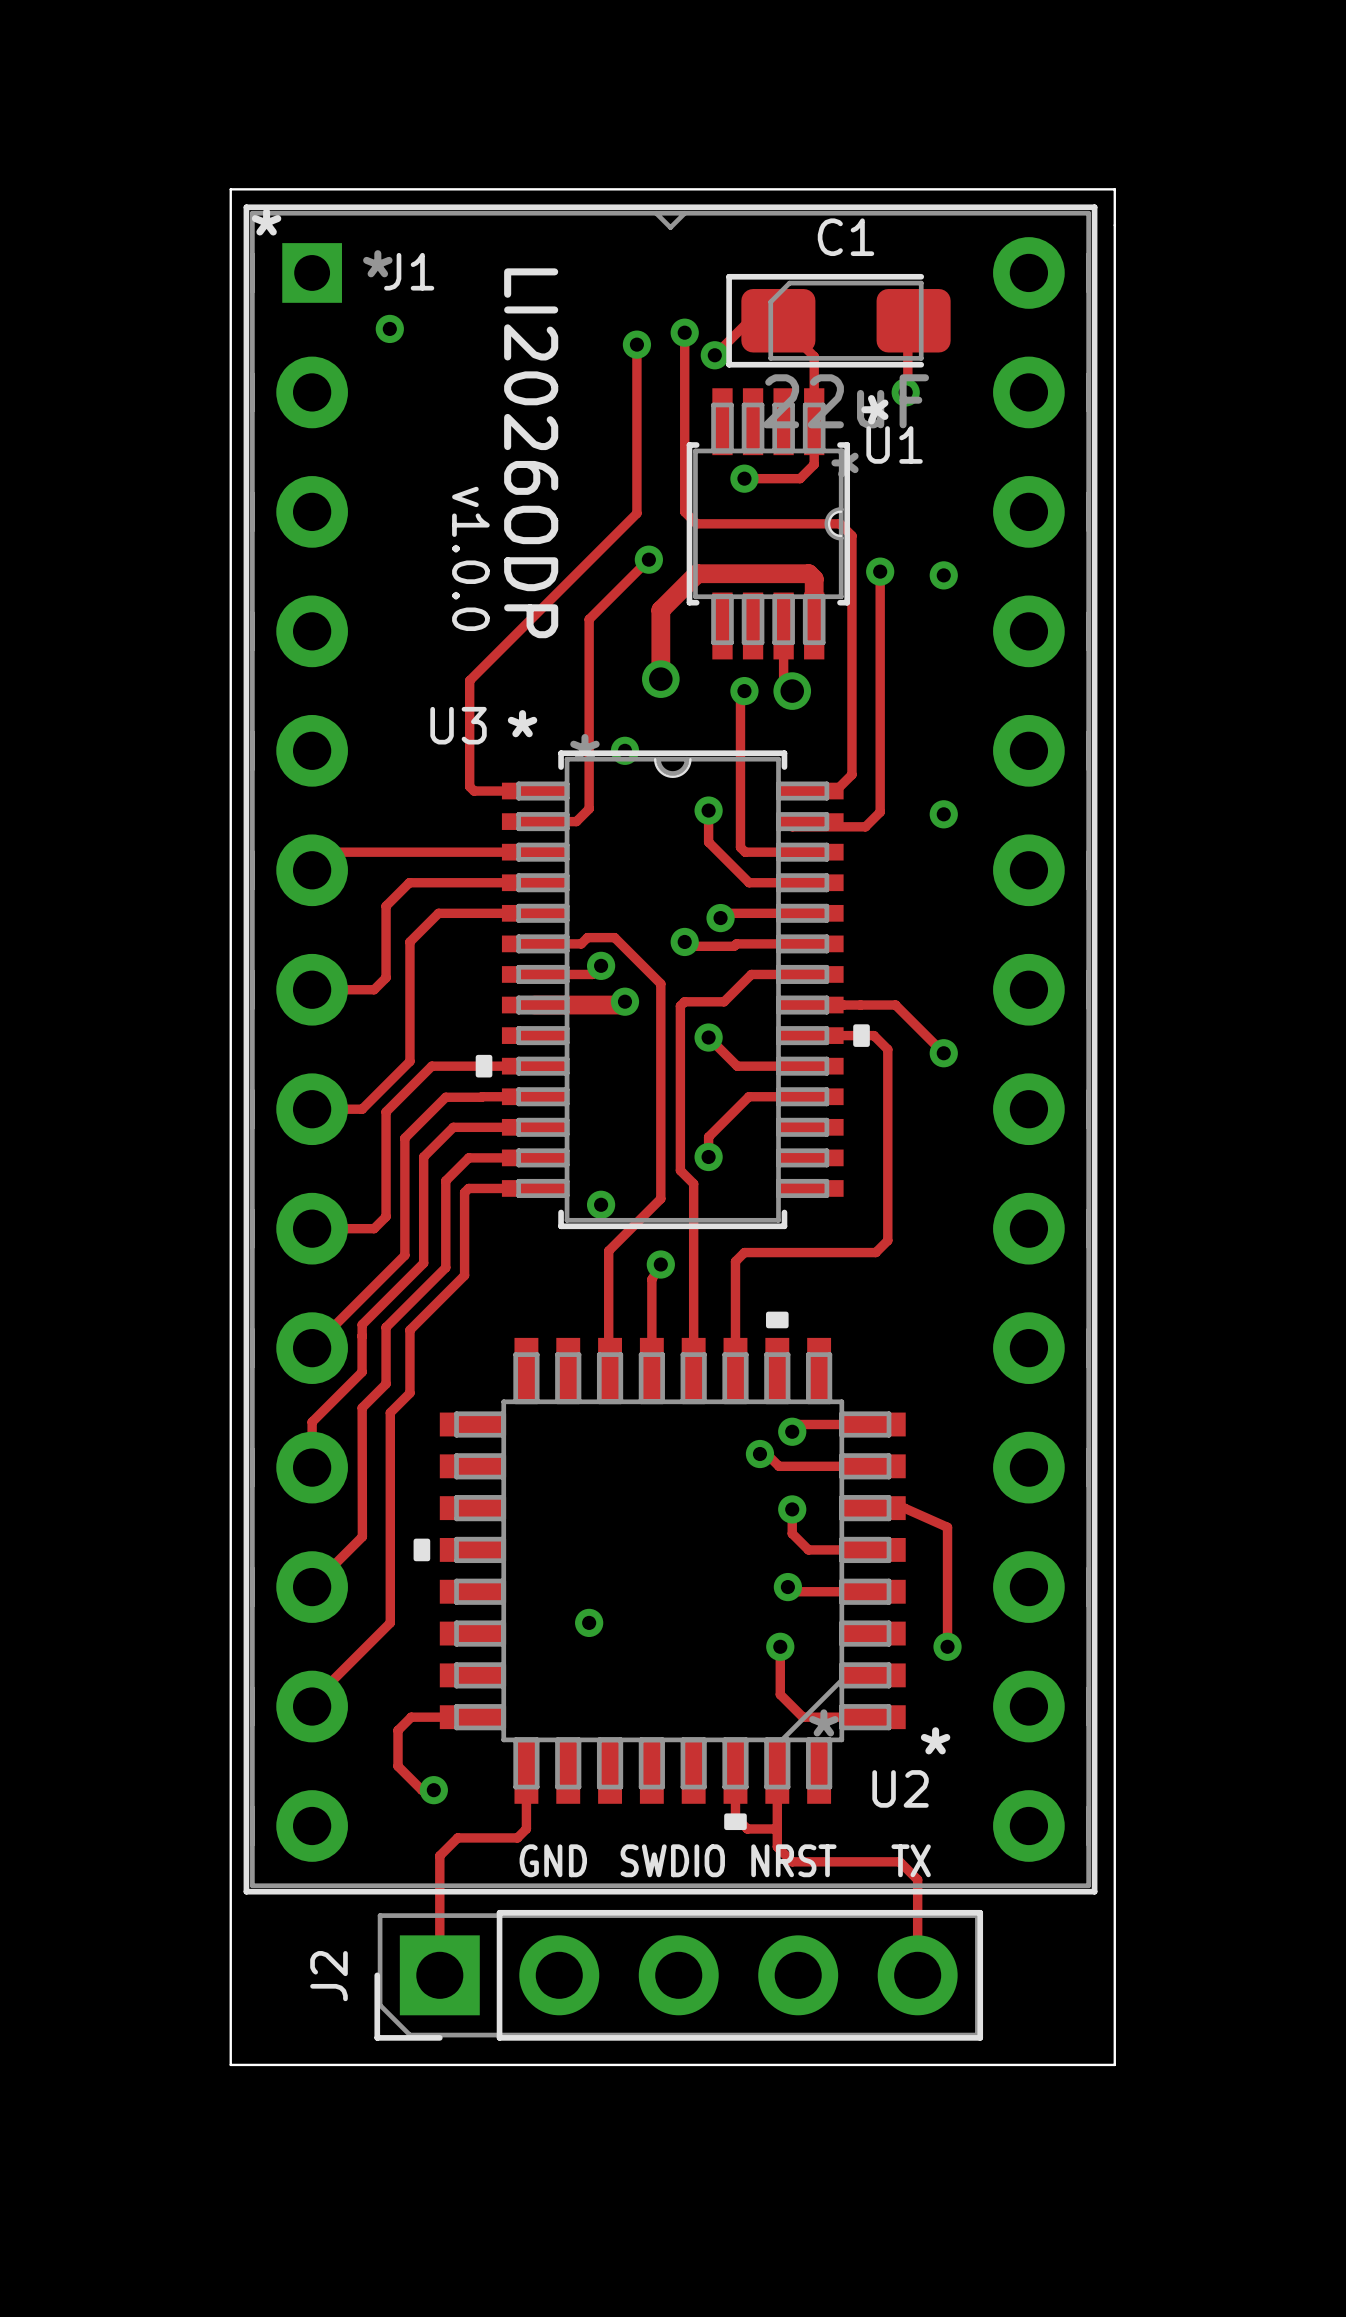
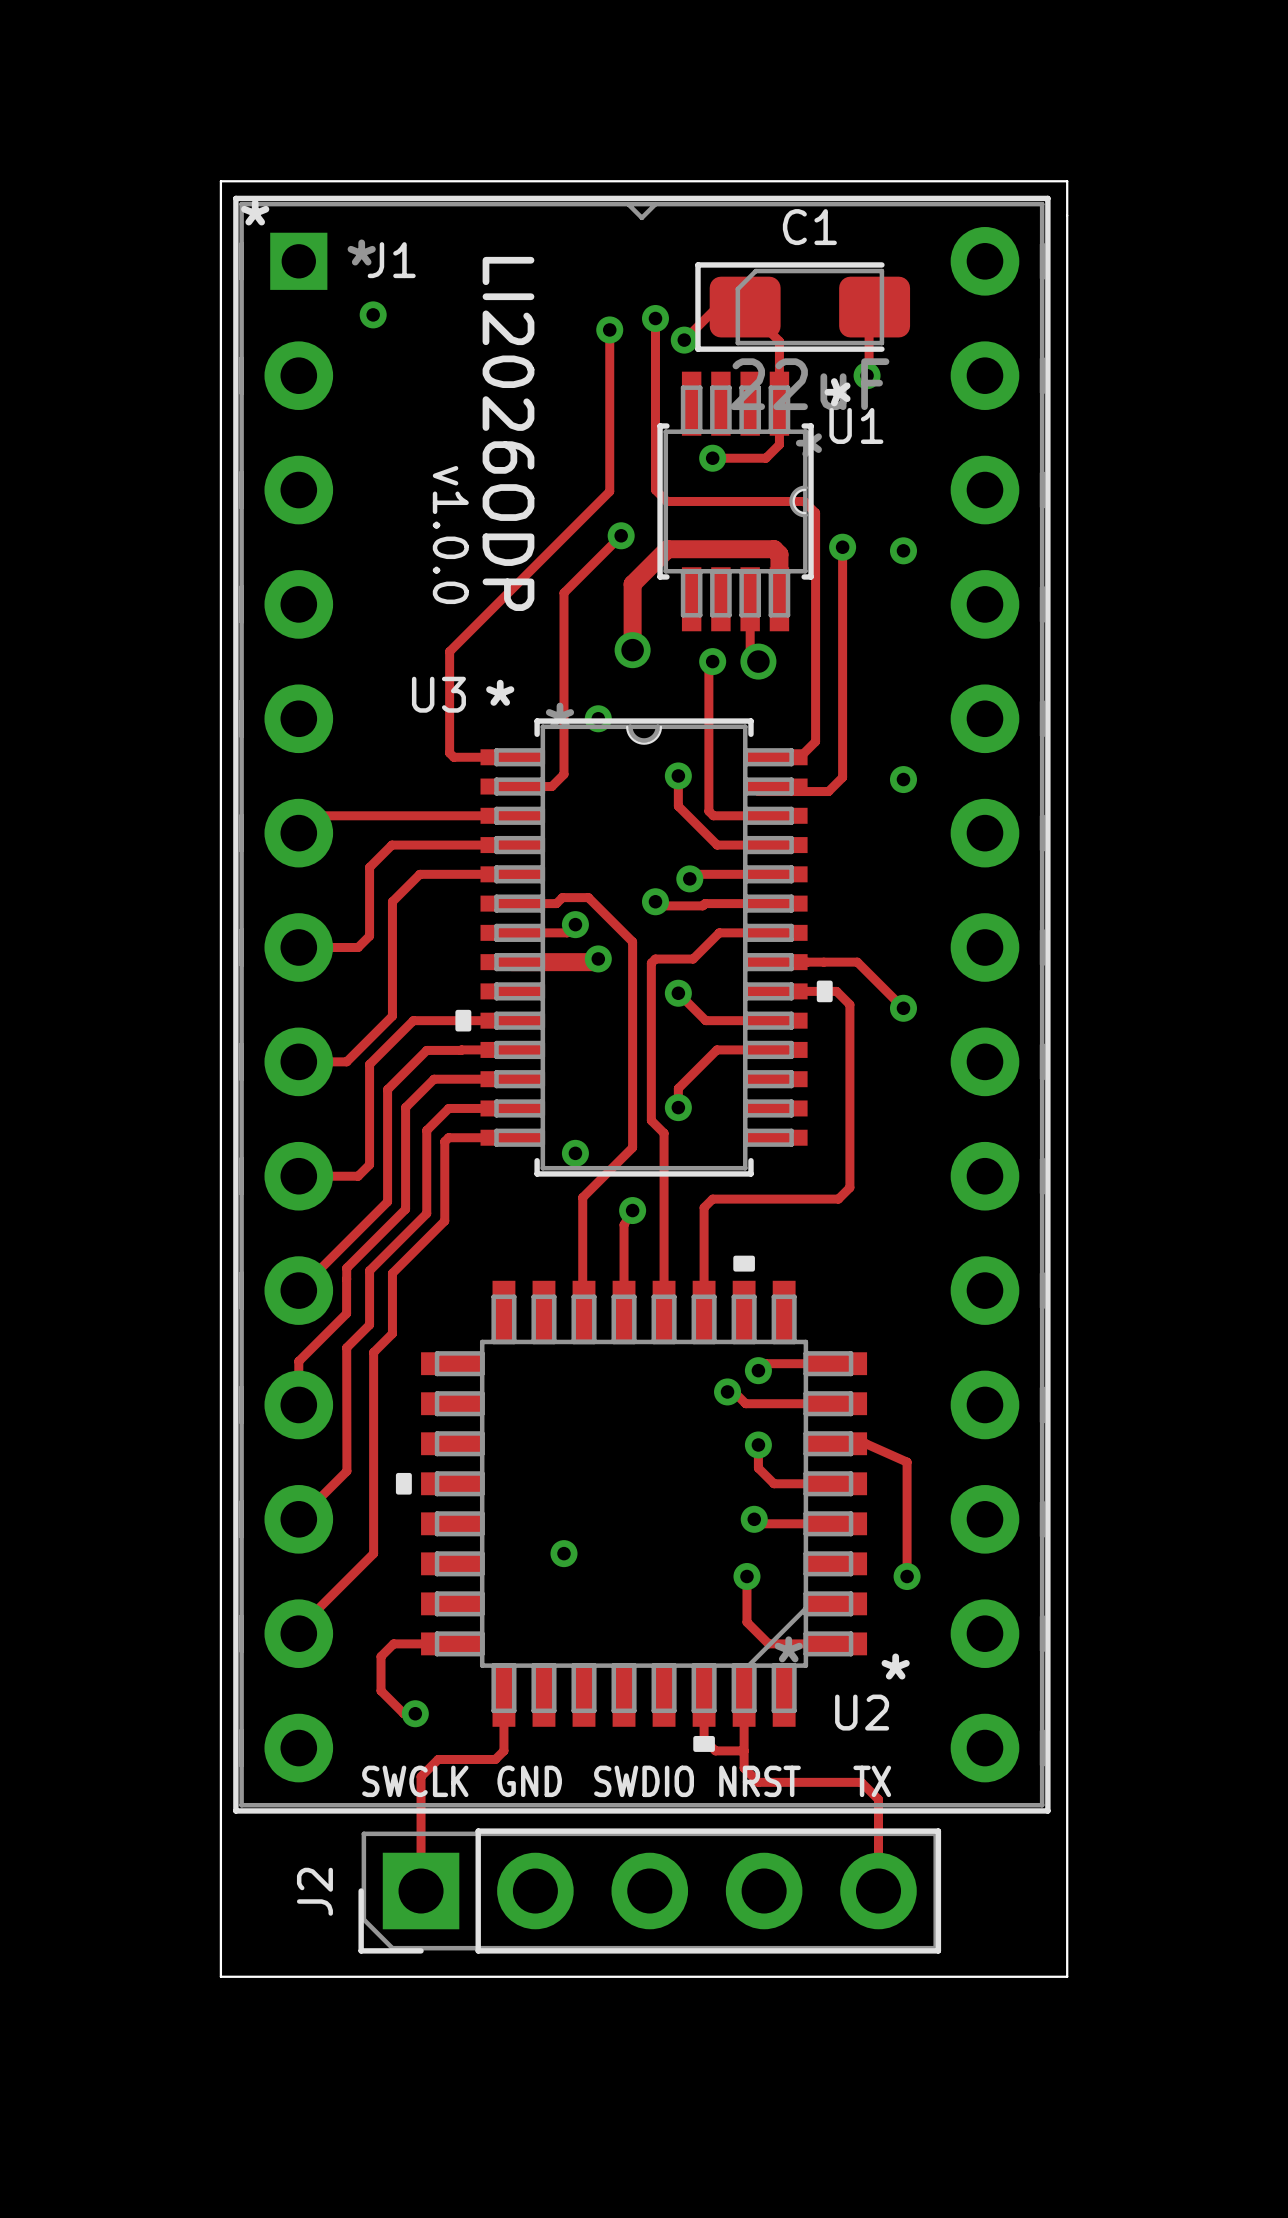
text: none -> SWCLK (415, 1781)

